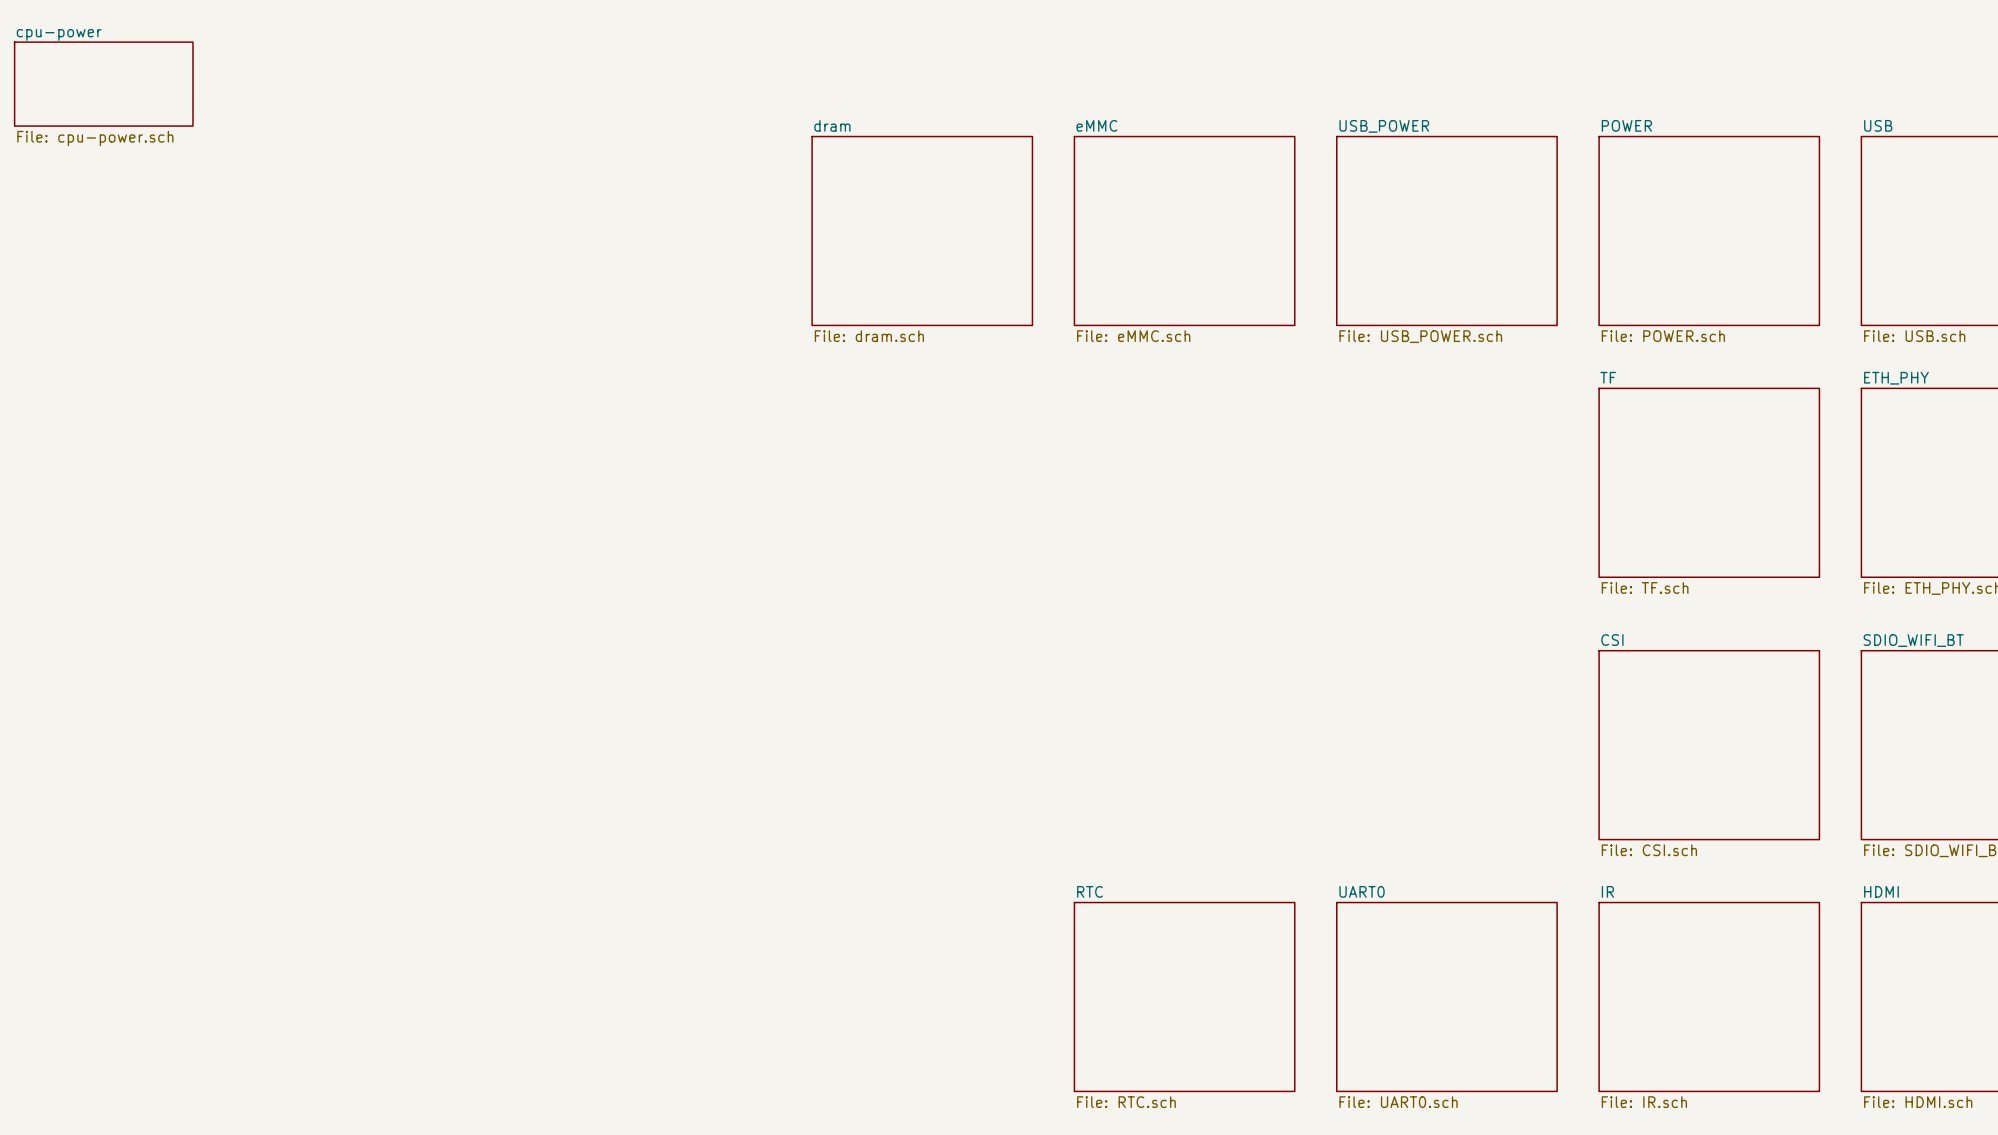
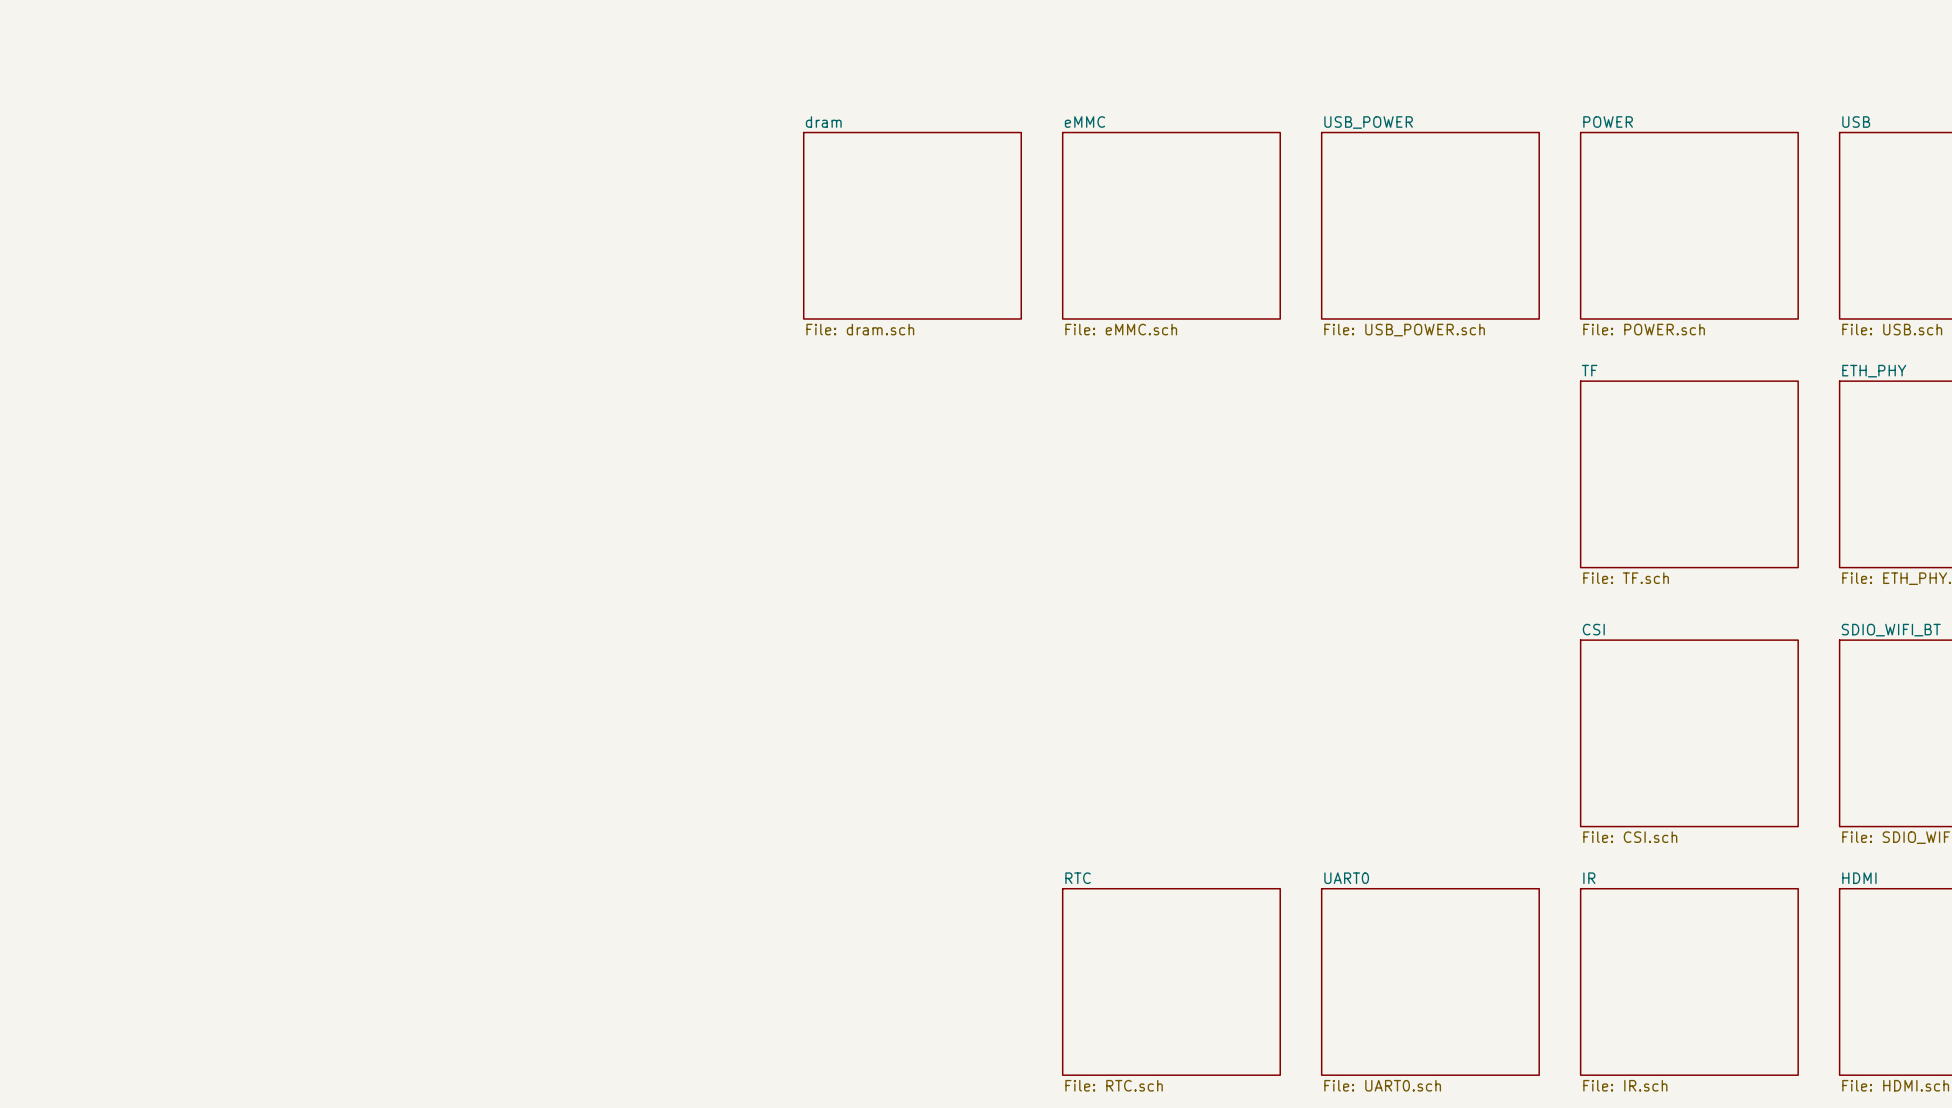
sheet cpu-power: File: cpu-power.sch (103, 84) -> none

